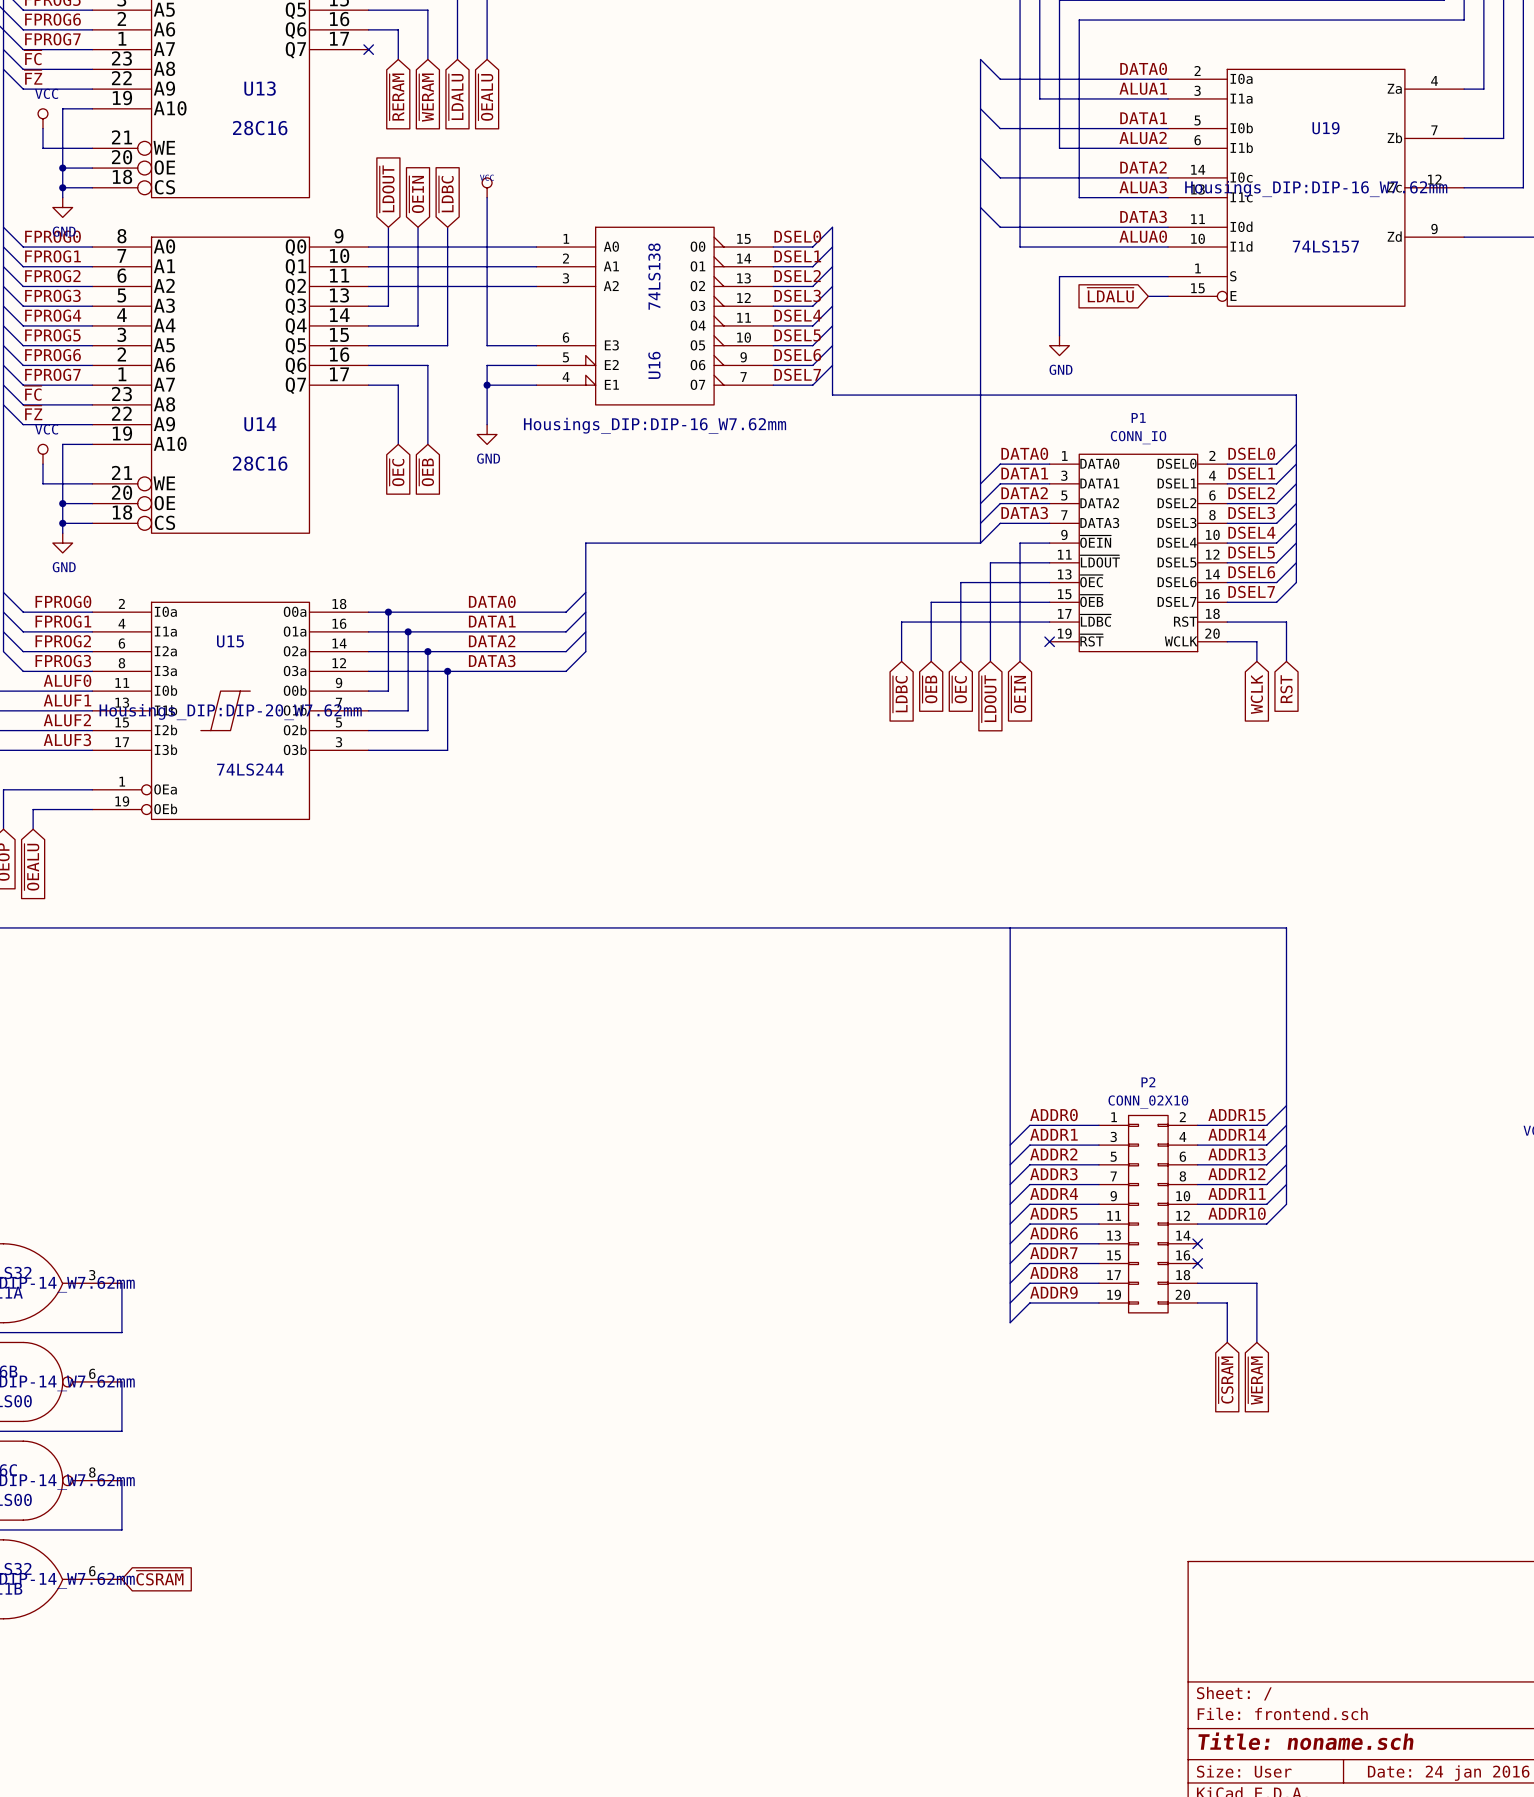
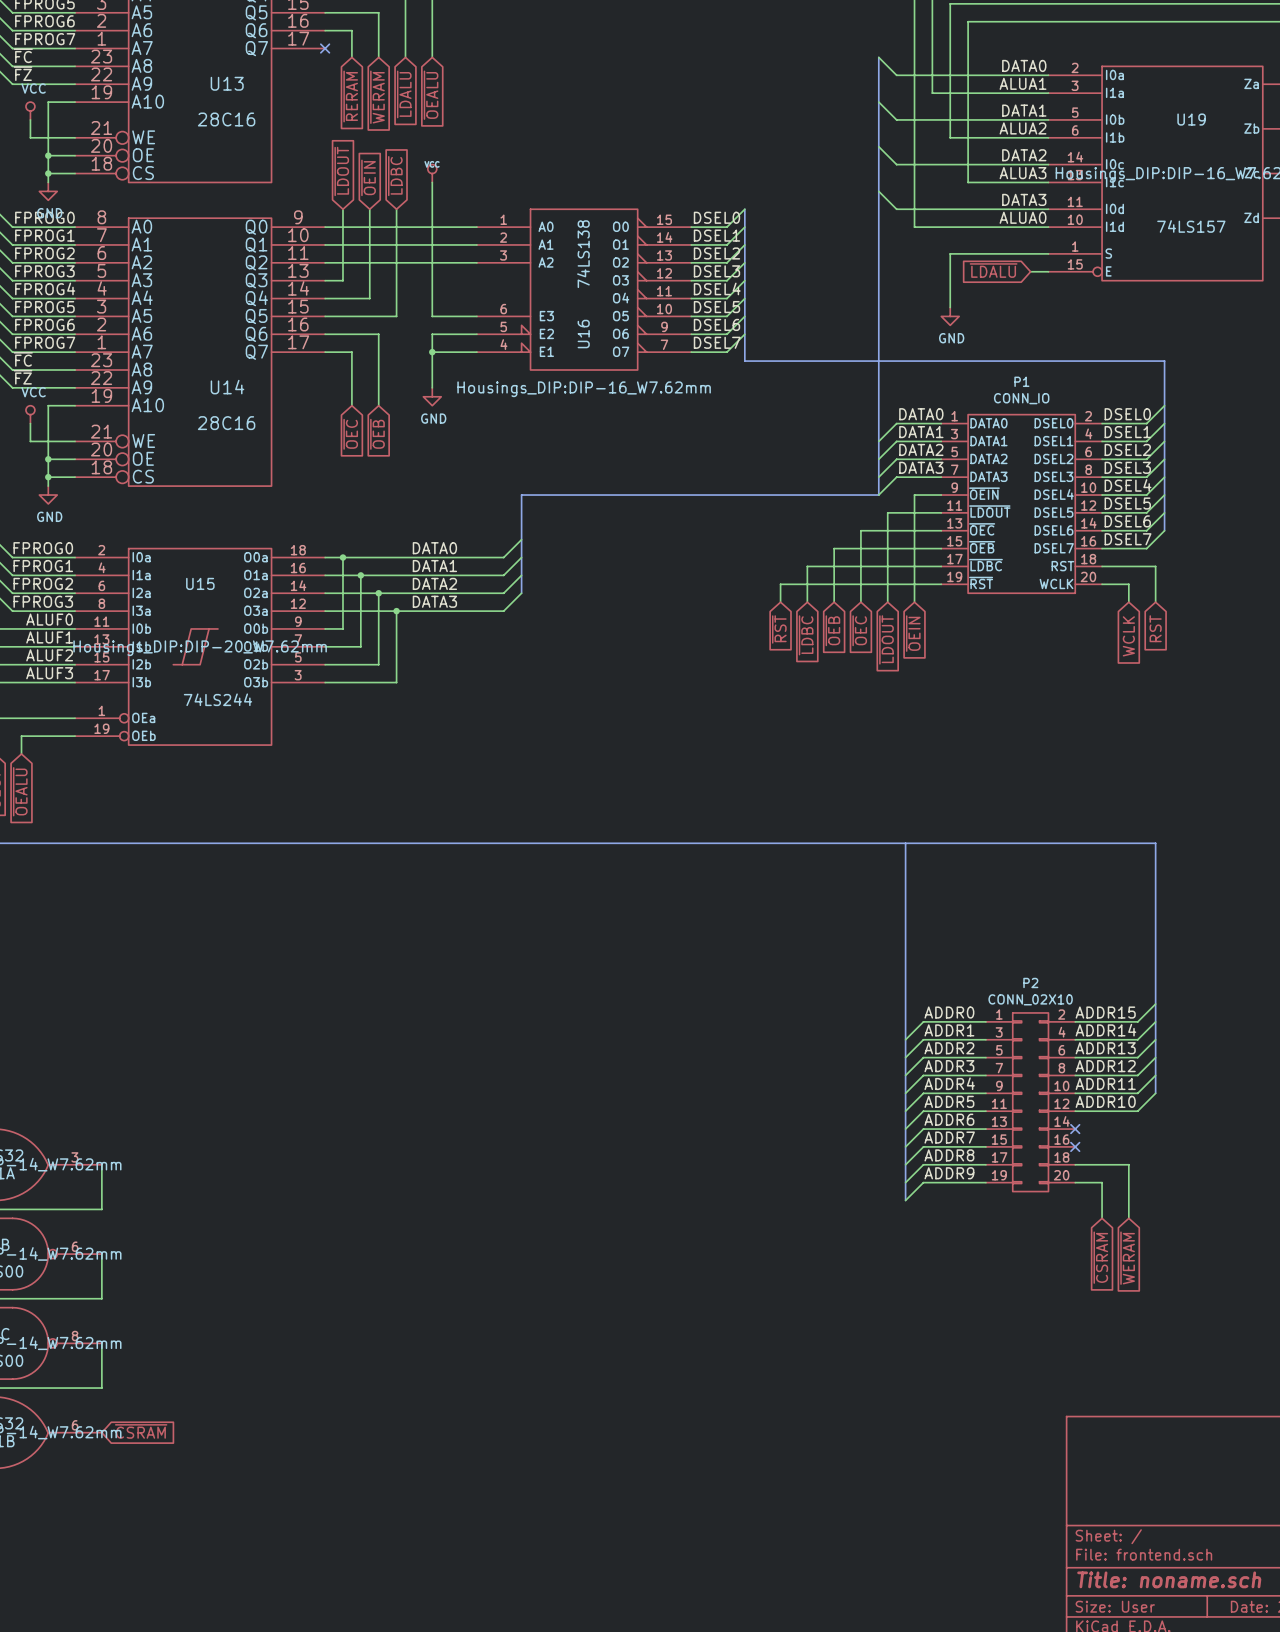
wire: none -> (941, 584) (780, 584) (780, 602)
no-connect mark: (1049, 641) -> none
global label: none -> ~{RST} (779, 629)

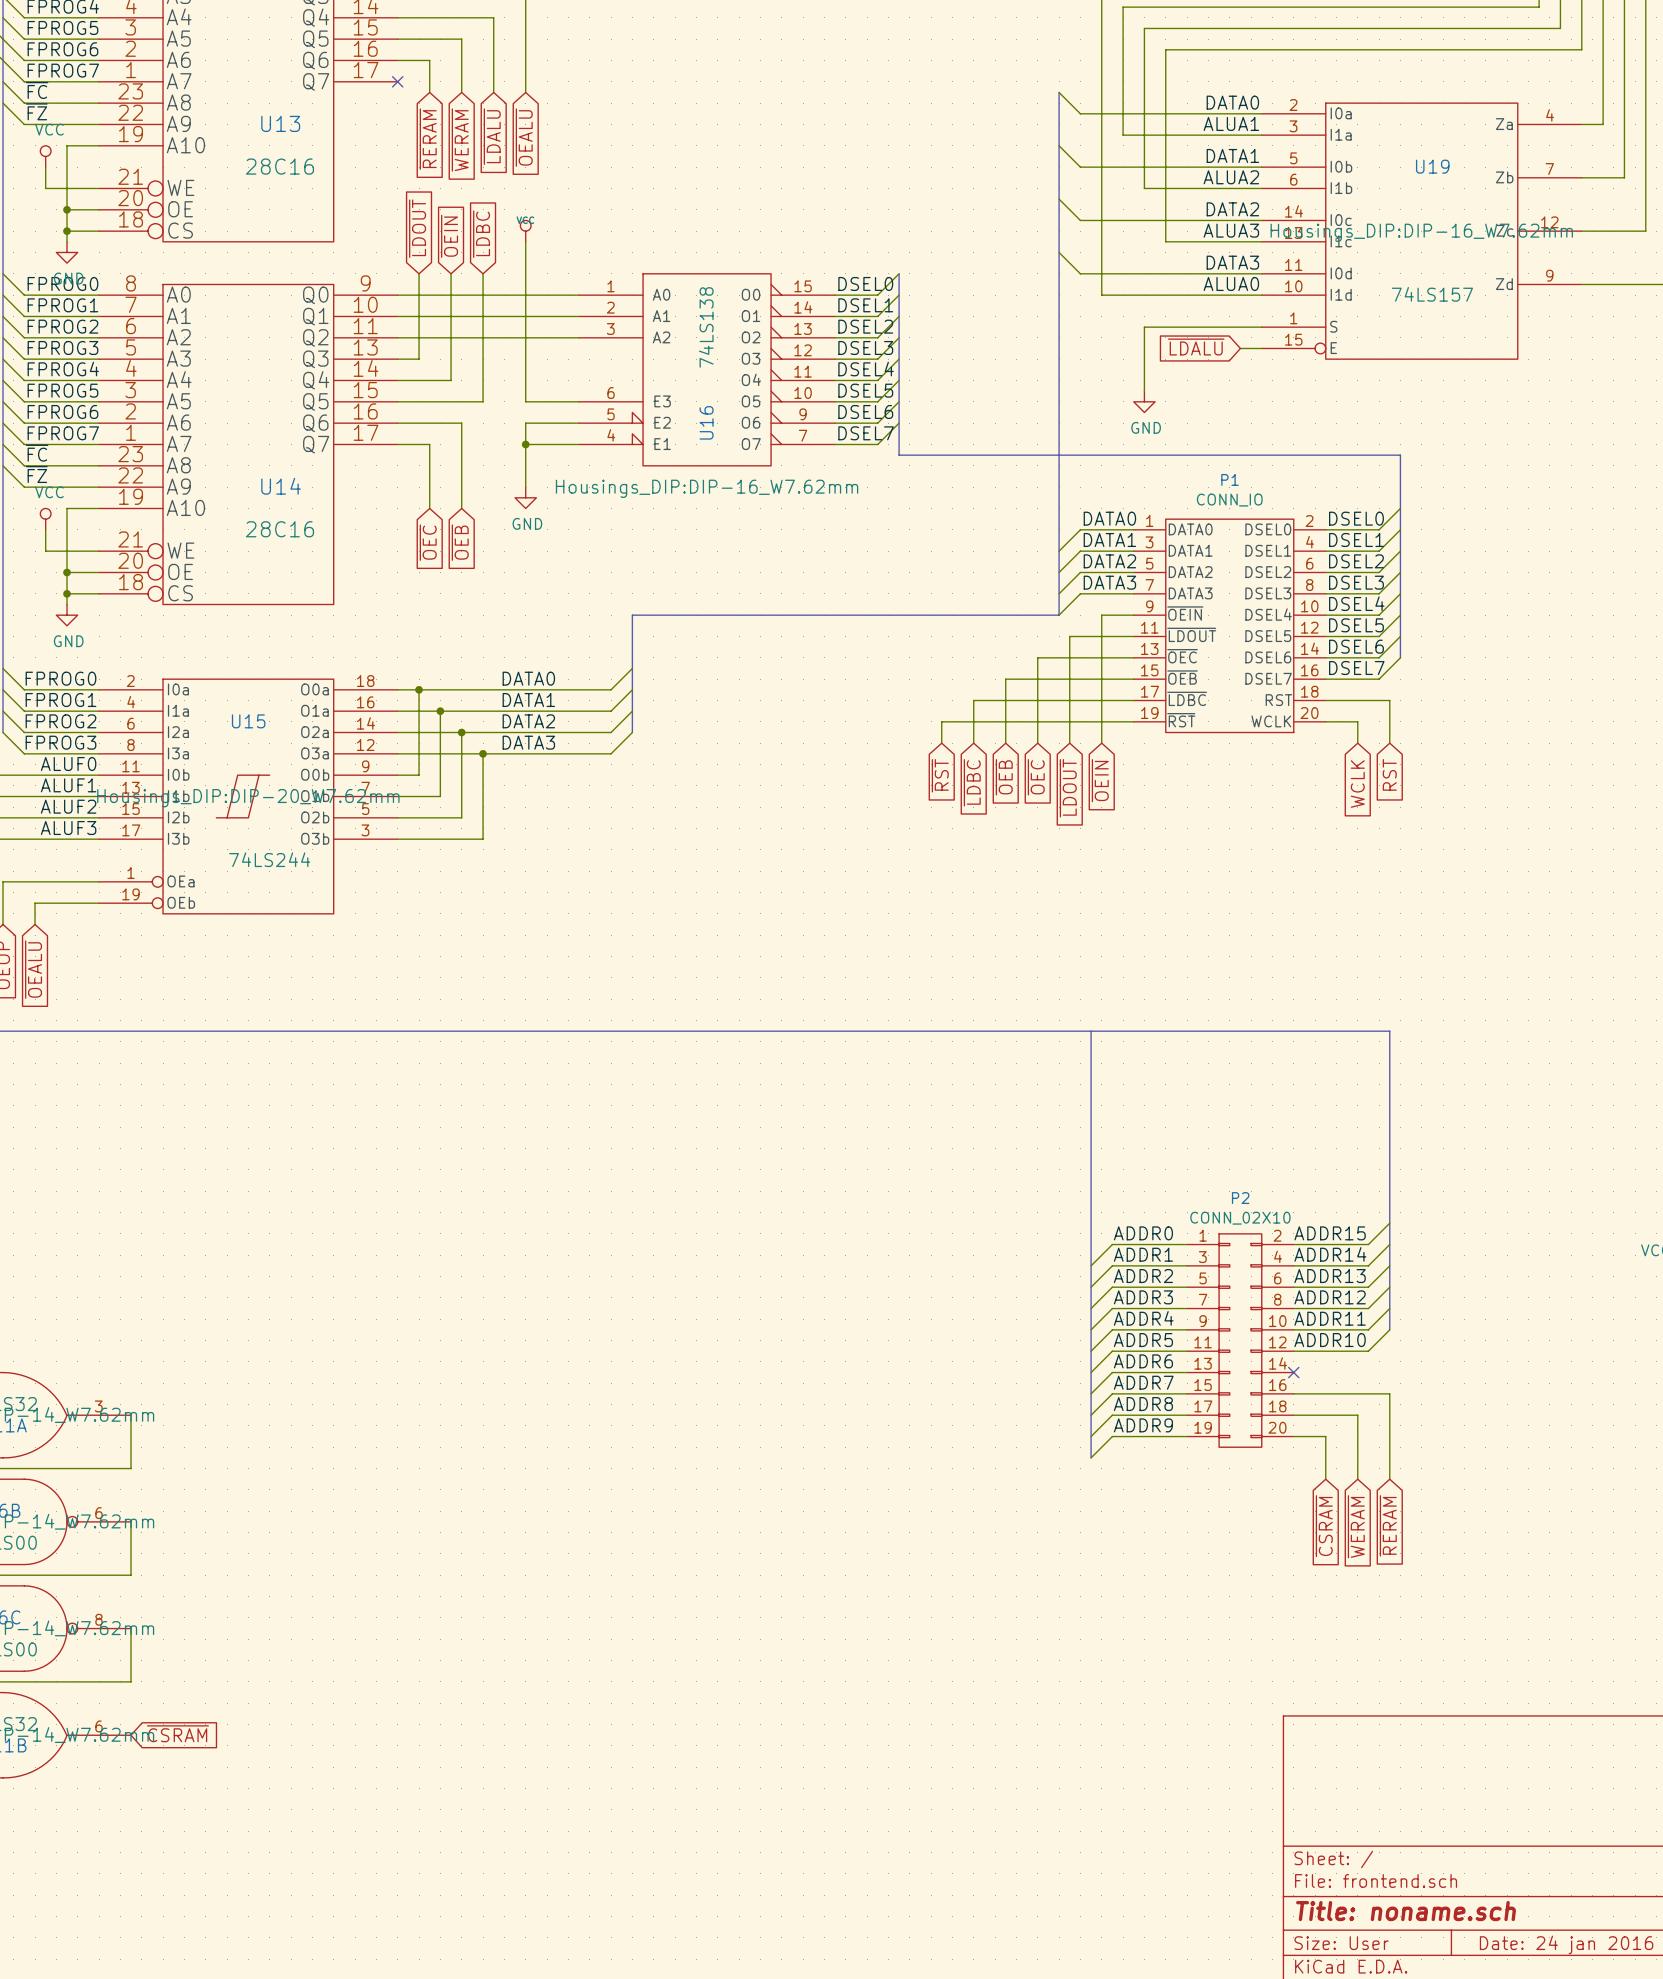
wire: none -> (1293, 1393) (1389, 1393) (1389, 1479)
no-connect mark: (1075, 1146) -> none
global label: none -> ~{RERAM} (1388, 1525)

